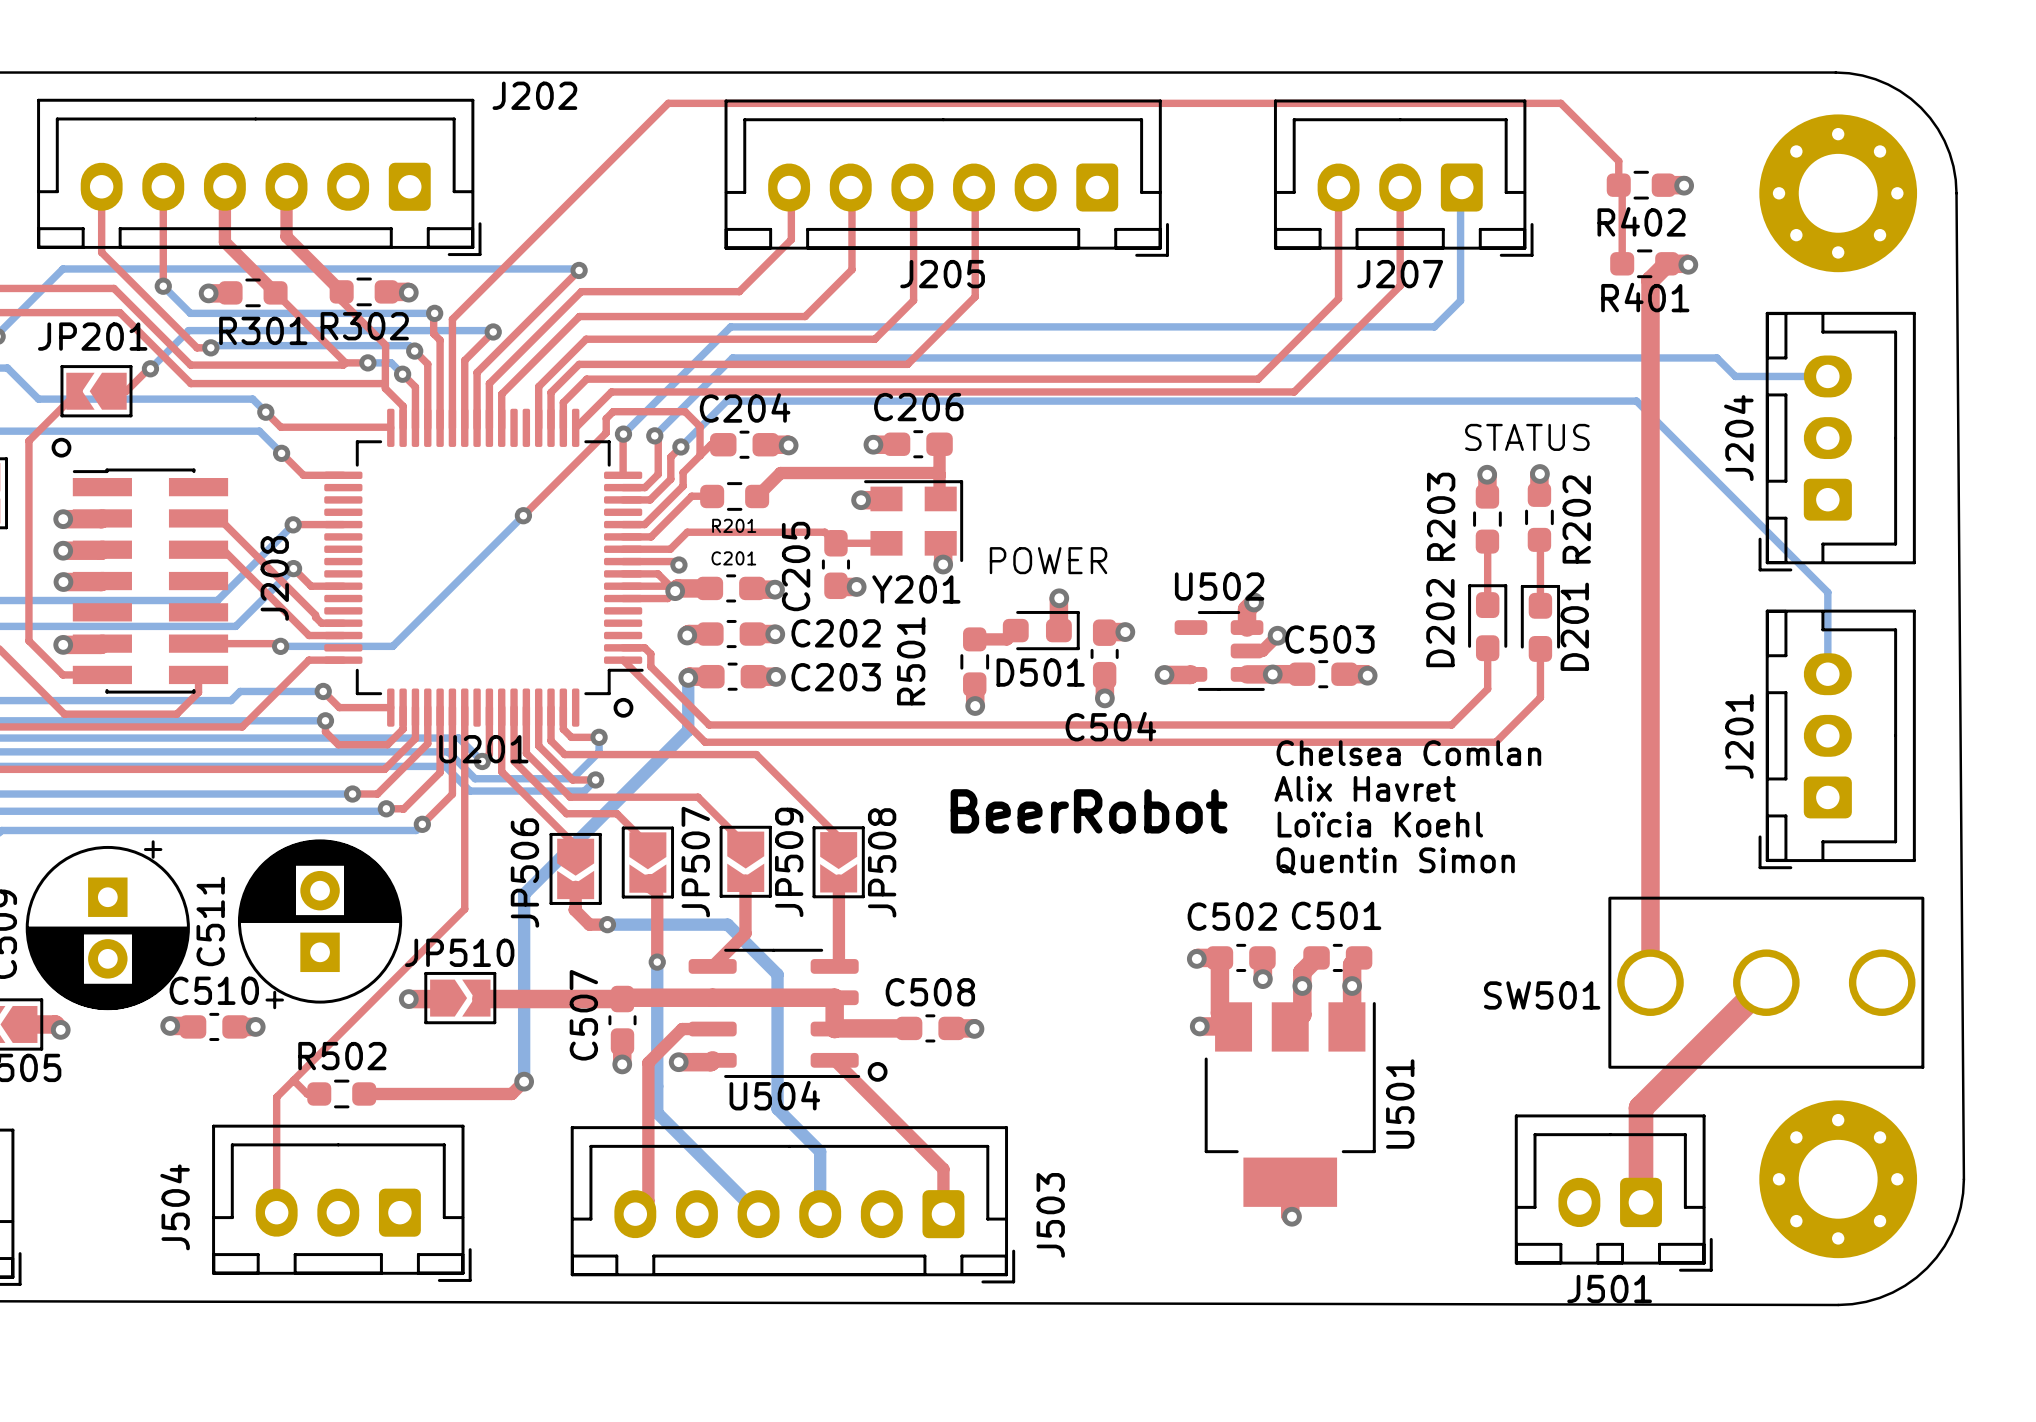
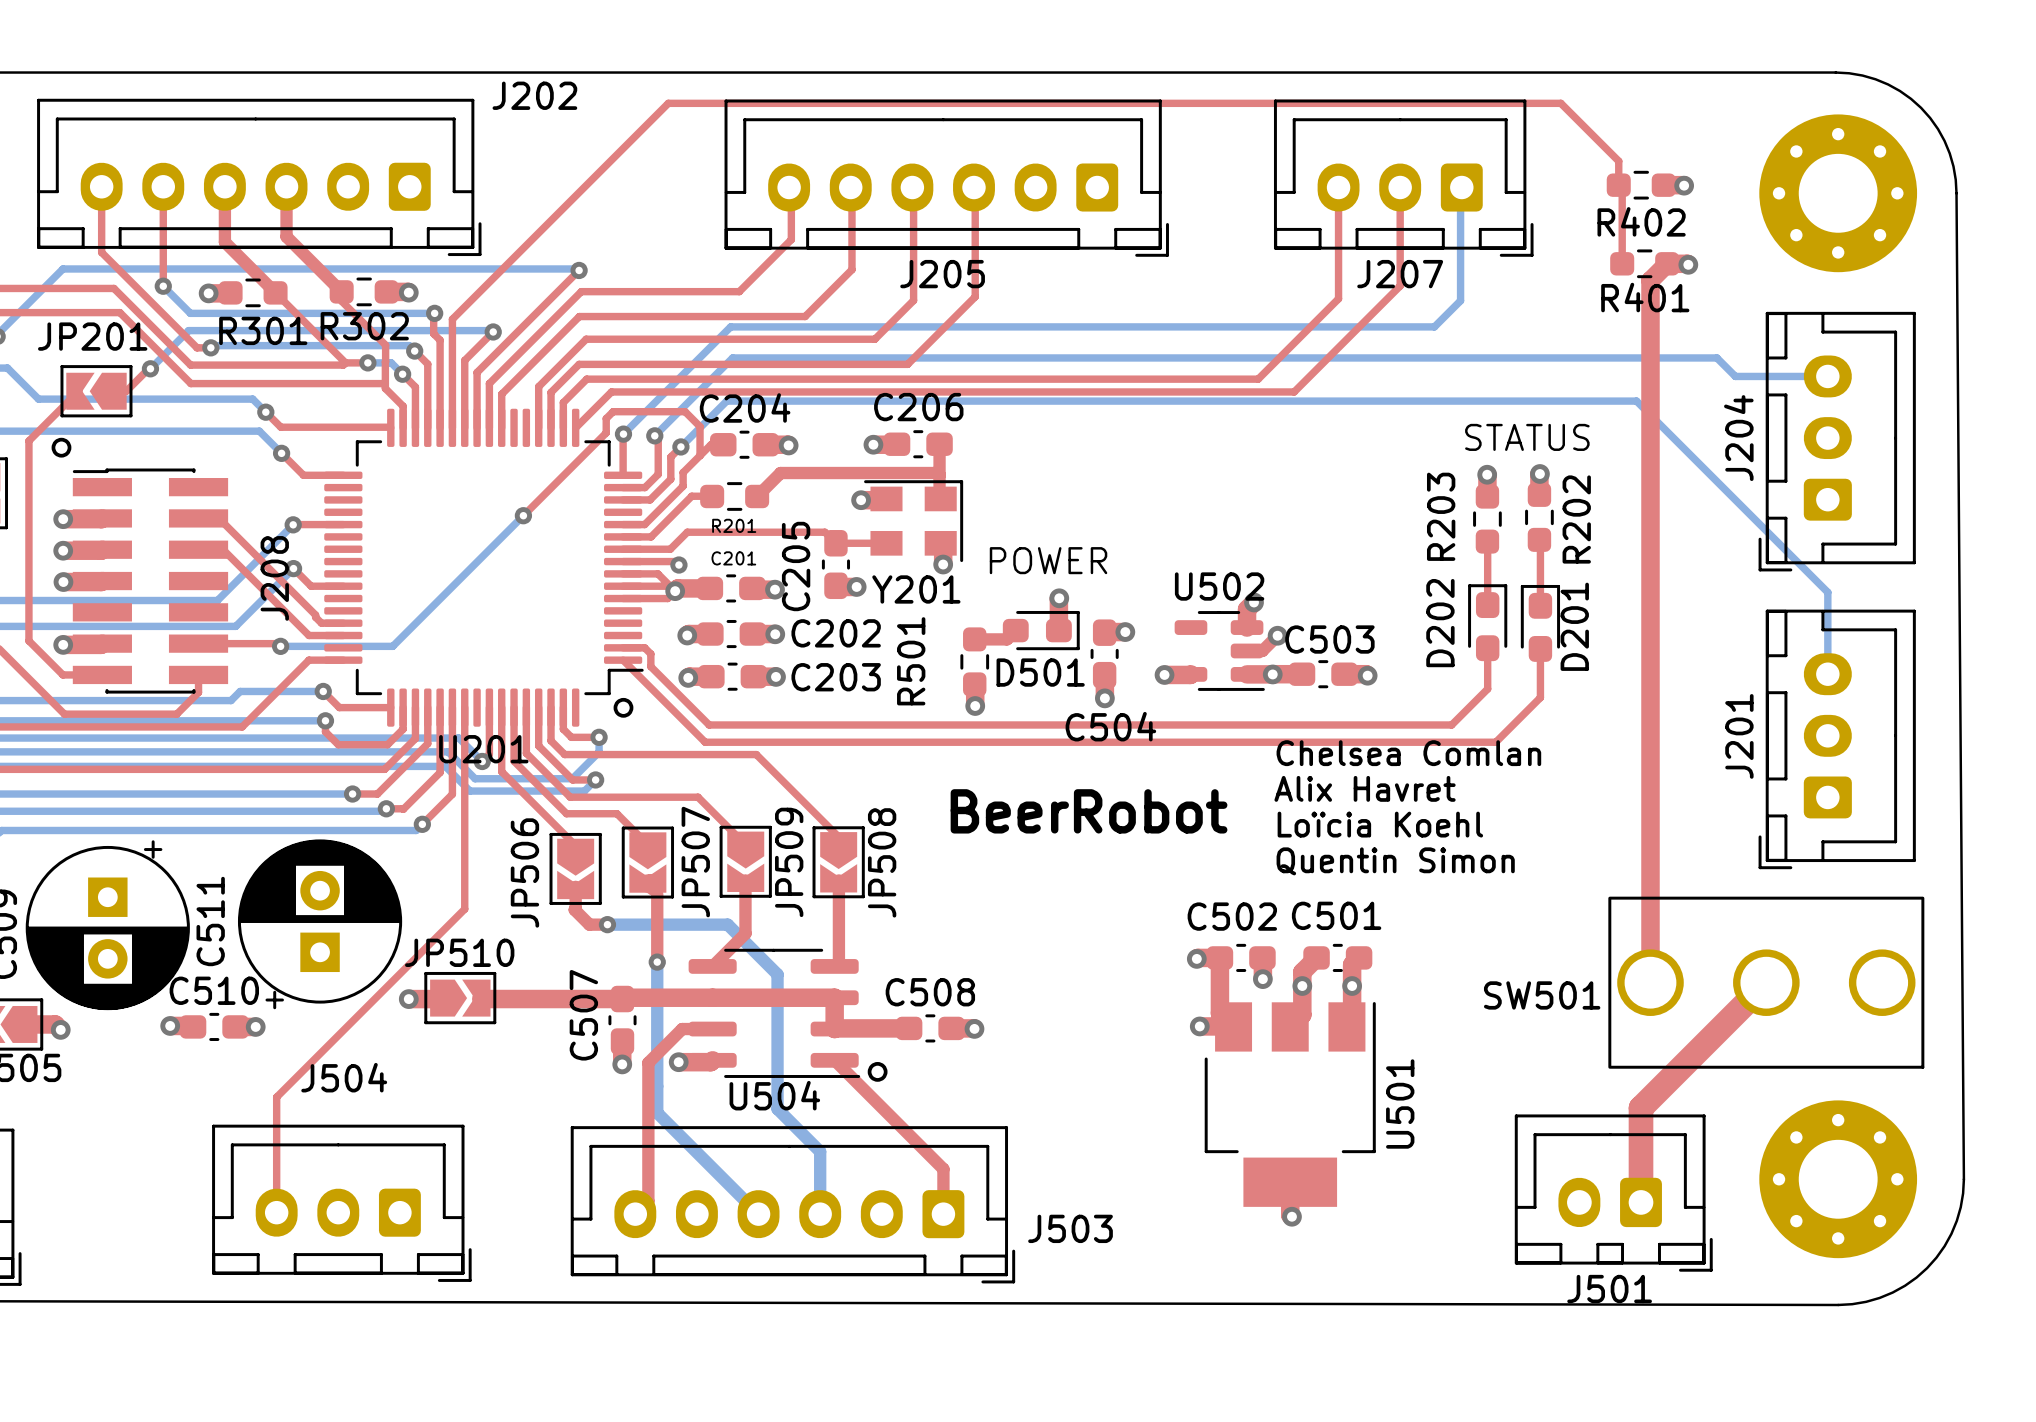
bottom track: (688, 677) (688, 730) (524, 894) (524, 1081) -> none
top track: (293, 1080) (307, 1093) (319, 1093) -> none
top track: (524, 1081) (511, 1093) (364, 1093) -> none
via: (524, 1081) -> none
R502: (341, 1093) -> none
J504 name rotation: 0° (175, 1207) -> 90° clockwise (344, 1077)
J504 name position: J504 (175, 1207) -> J504 (344, 1077)
J503 name rotation: 0° (1050, 1215) -> 90° clockwise (1070, 1228)

